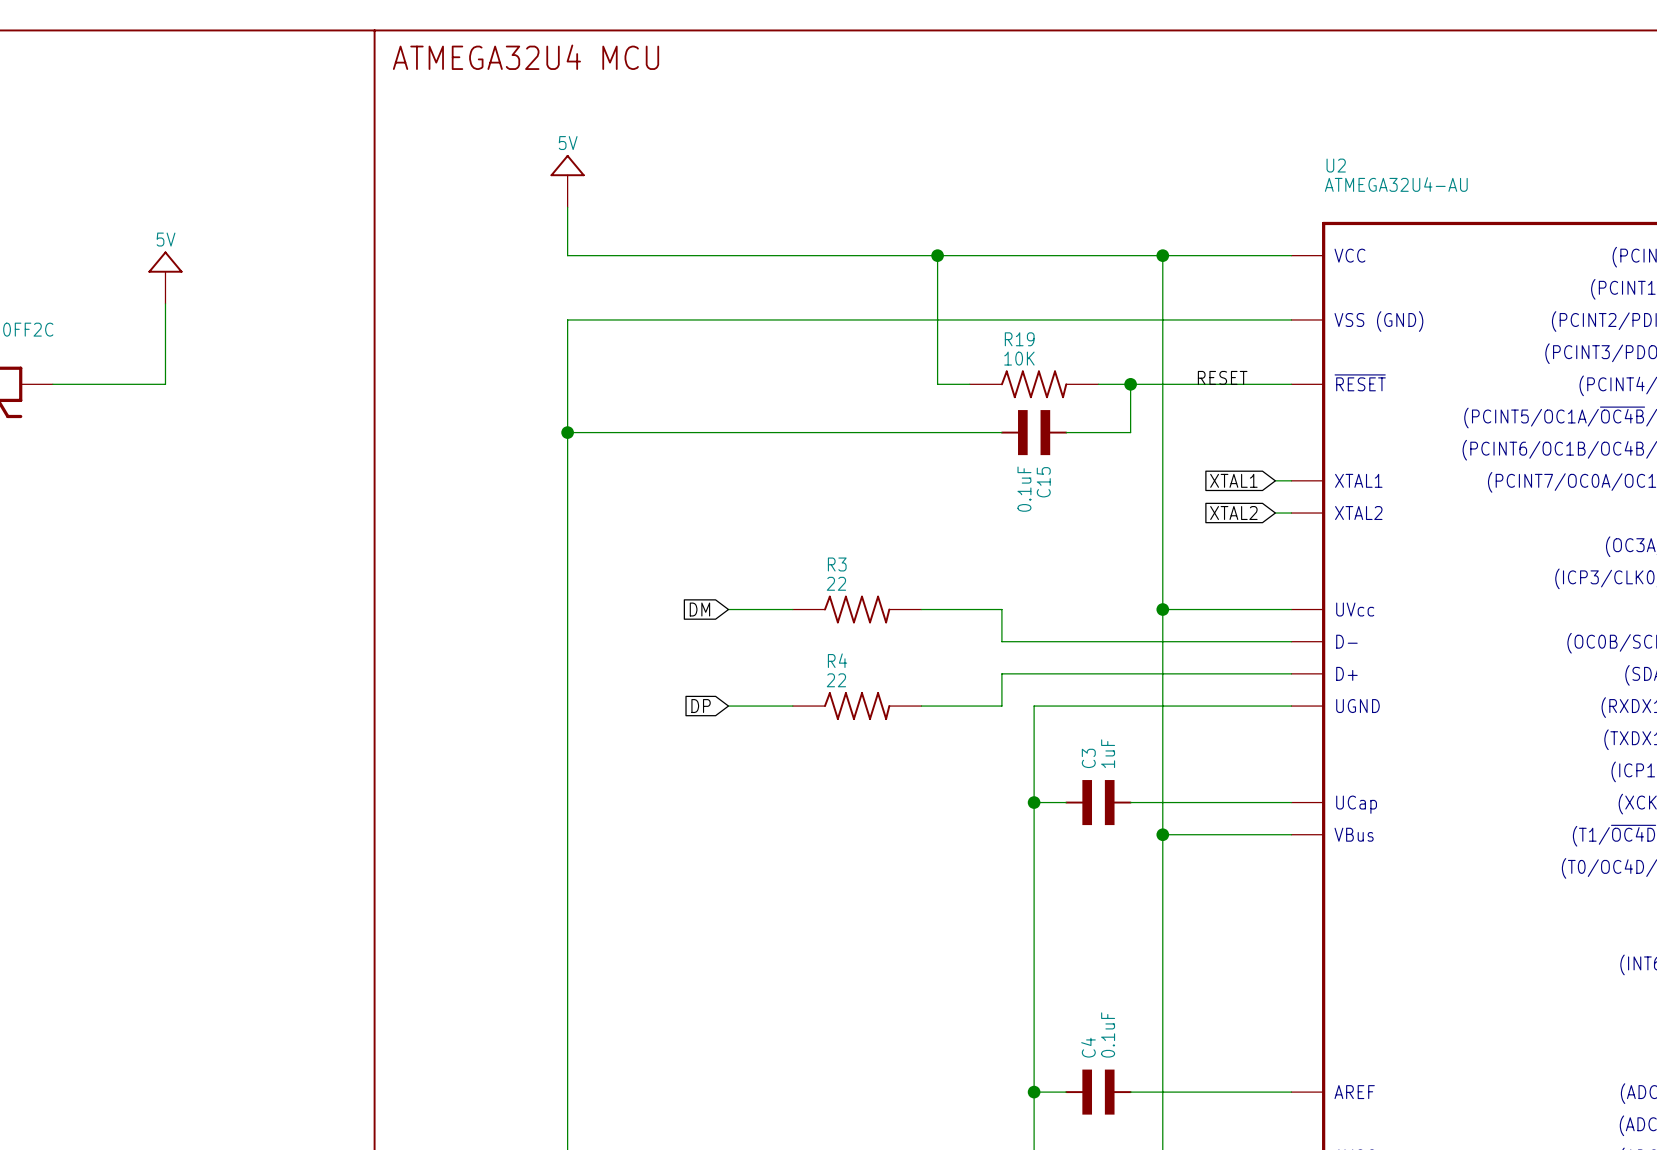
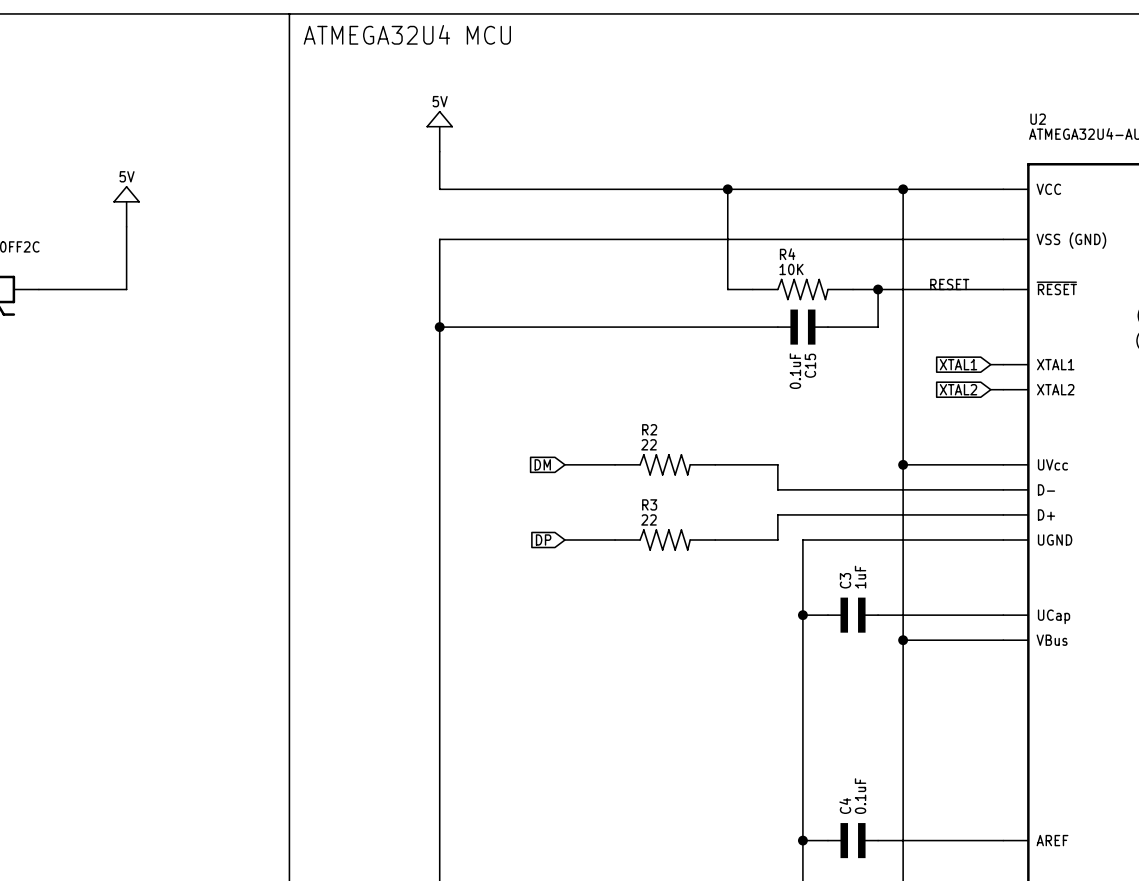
R19 name: R19 (1019, 339) -> R4 (787, 254)
R3 name: R3 (837, 564) -> R2 (649, 429)
R4 name: R4 (837, 660) -> R3 (649, 504)

